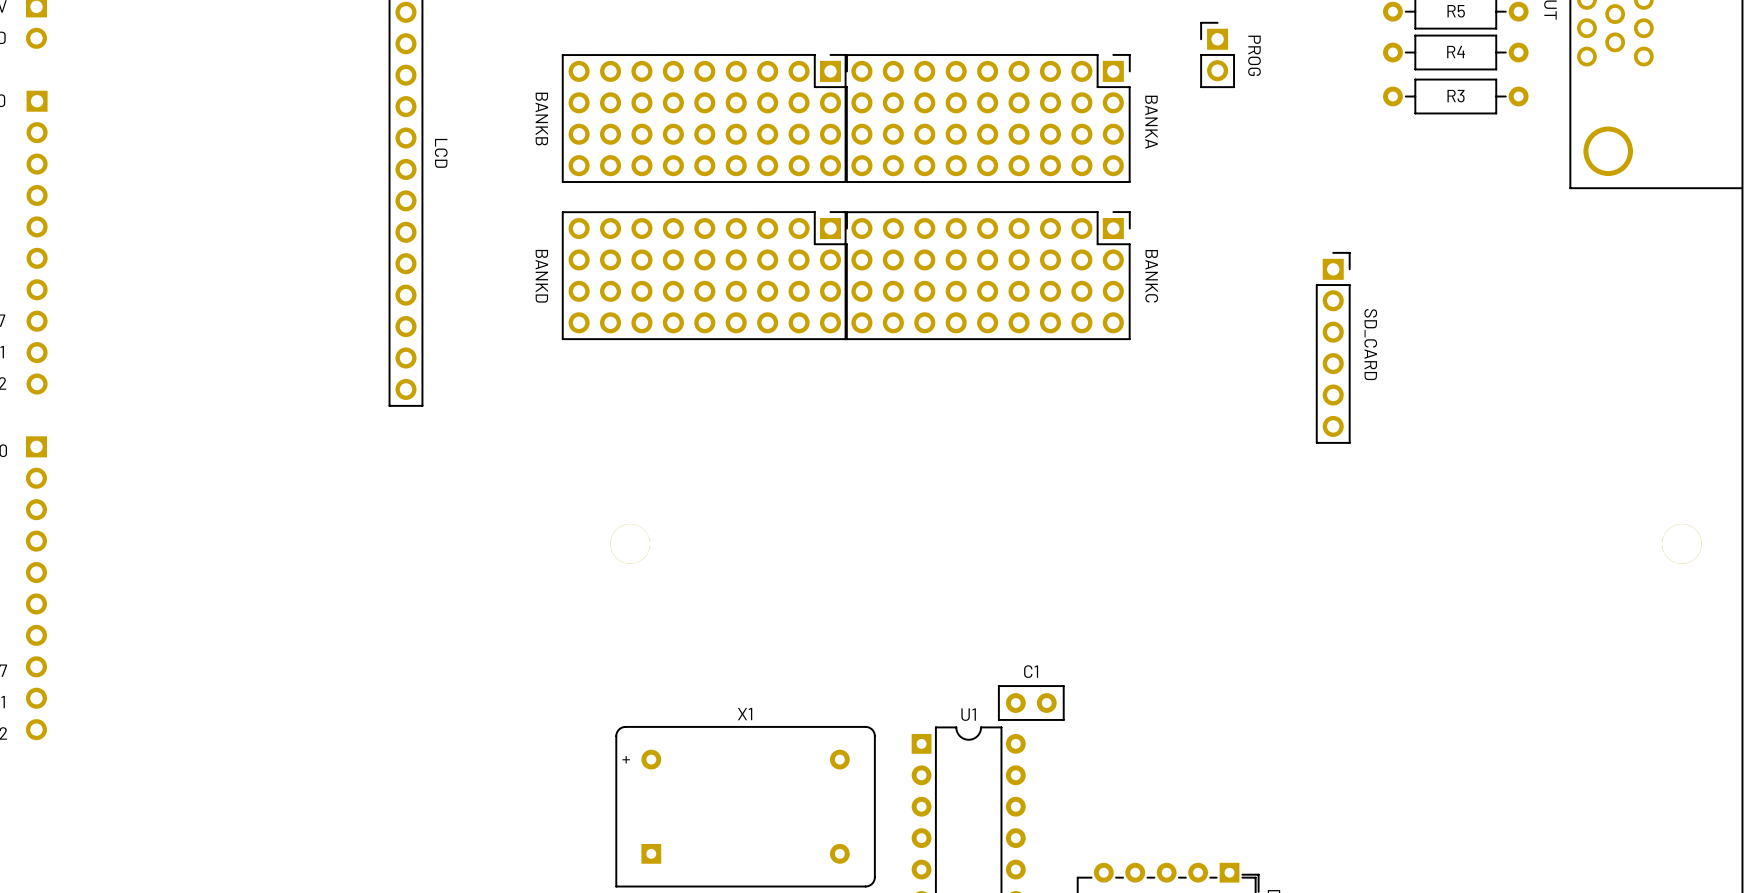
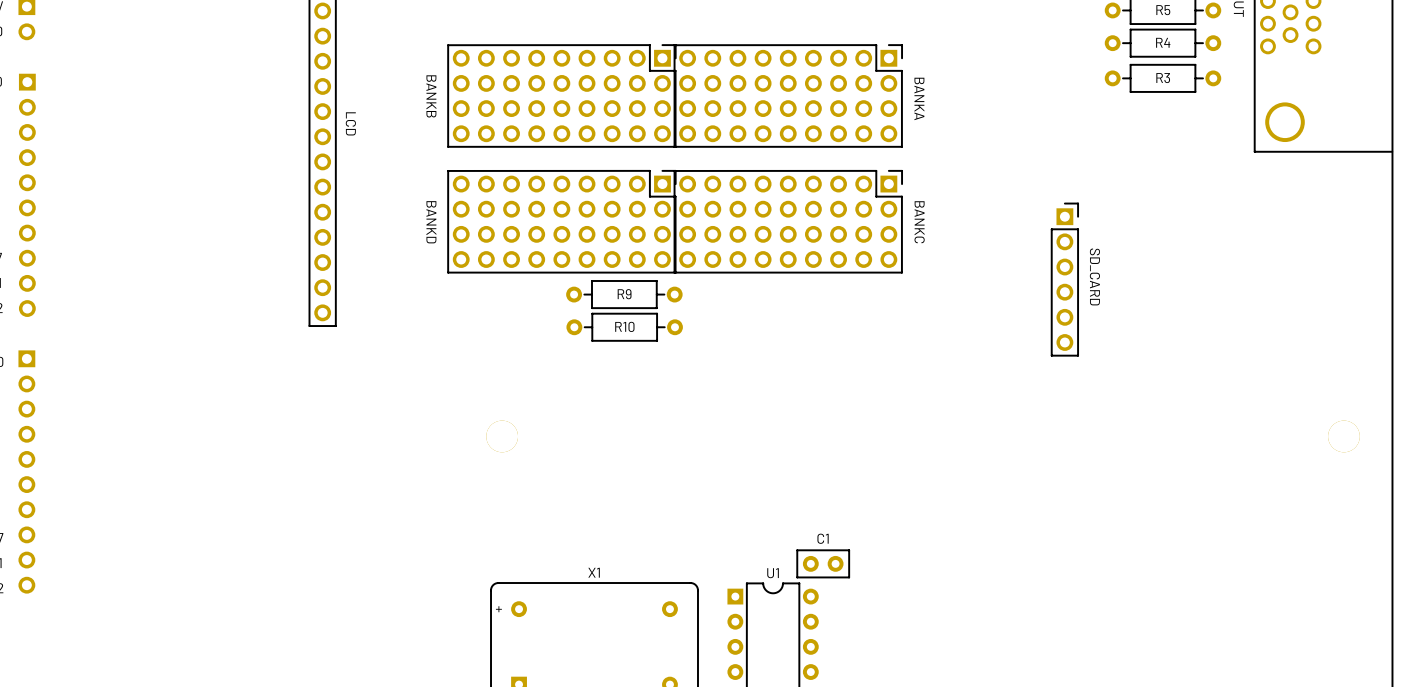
part: PROG (1217, 54) -> none
R9: none -> (624, 294)
R10: none -> (624, 327)

